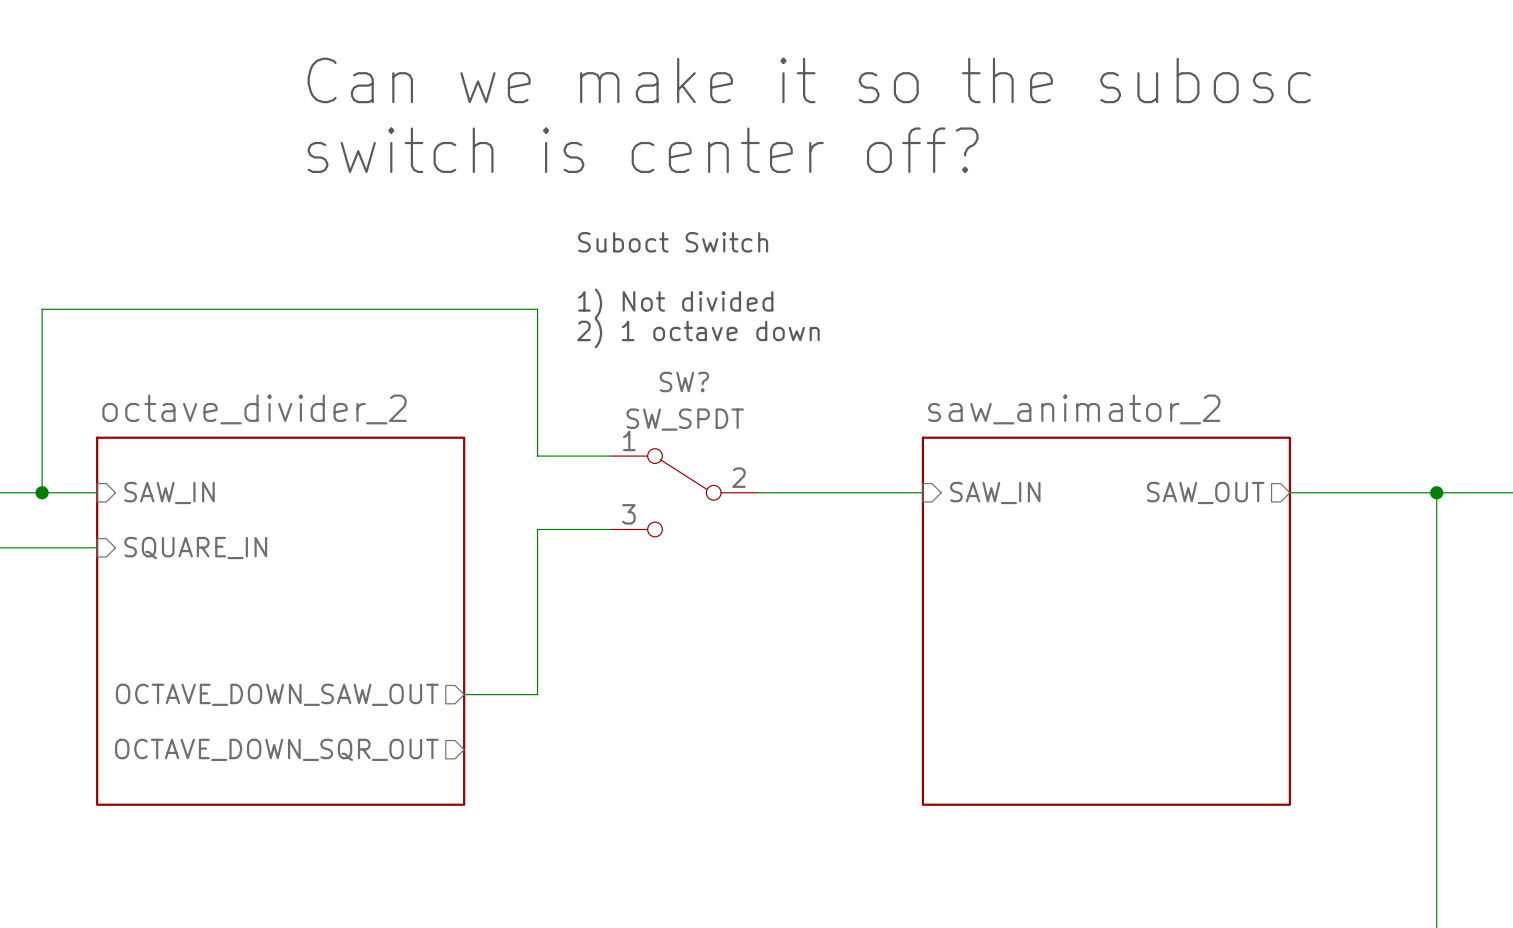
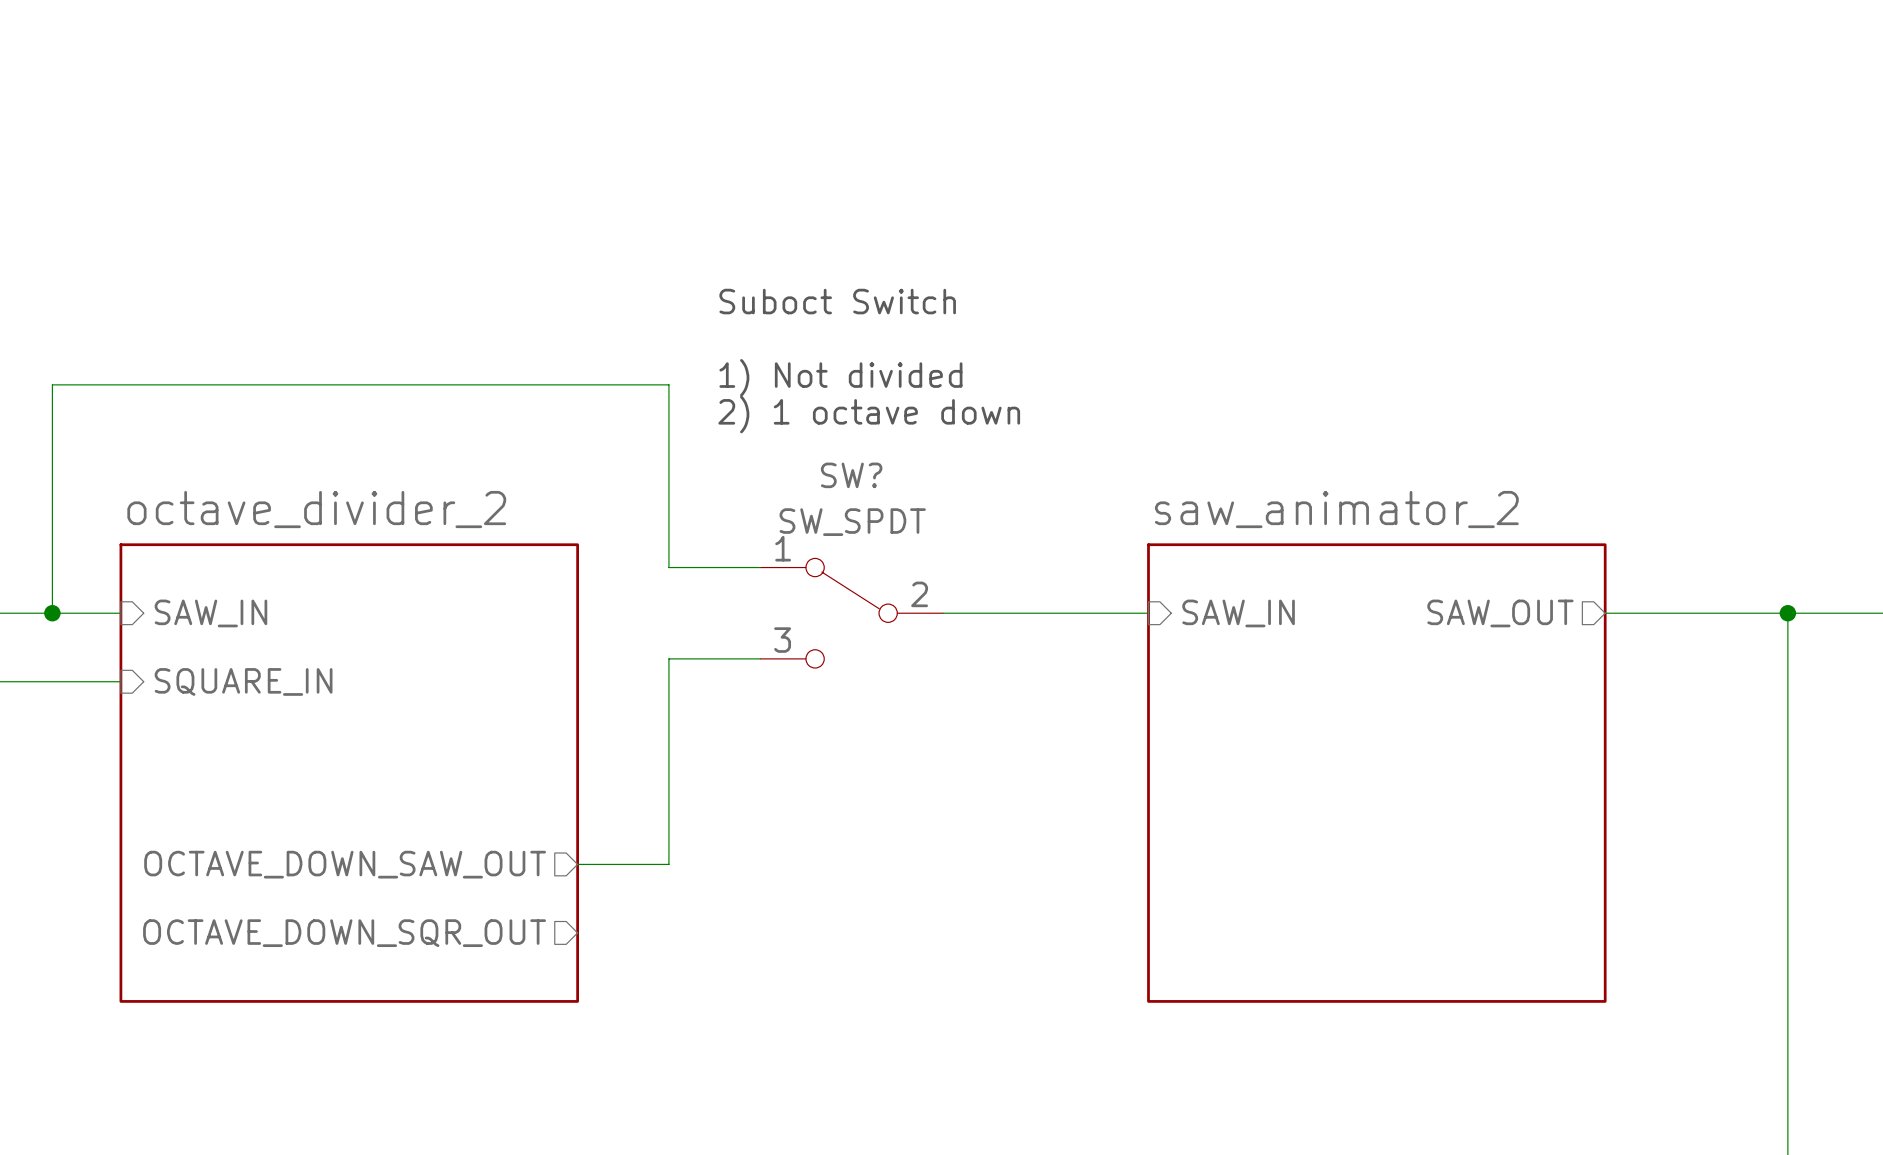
text: Can we make it so the subosc (809, 80) -> none
text: switch is center off? (643, 150) -> none

